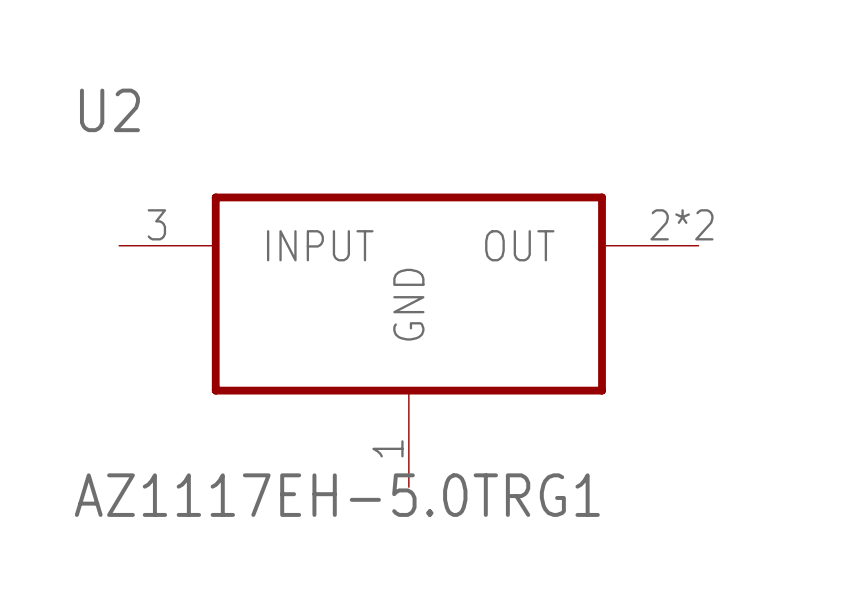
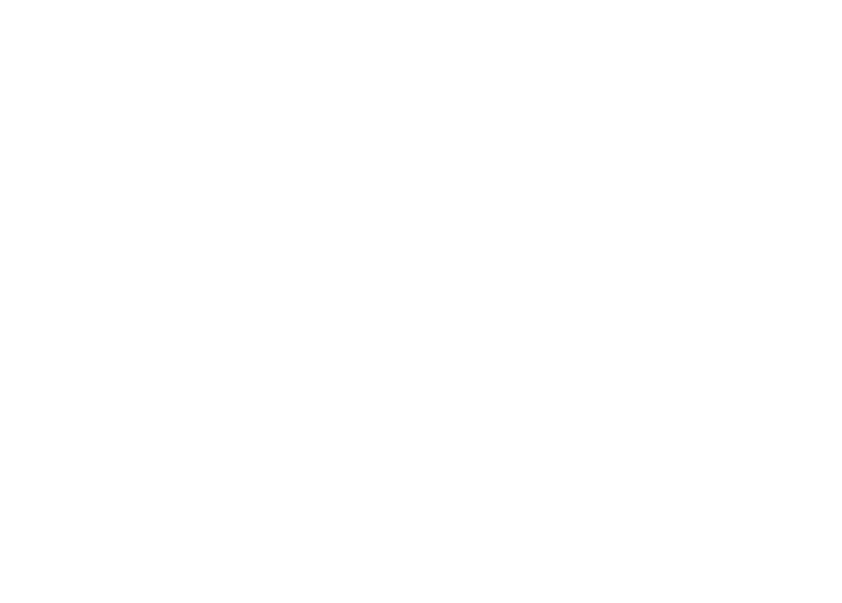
U2: AZ1117EH-5.0TRG1 (408, 340) -> none

